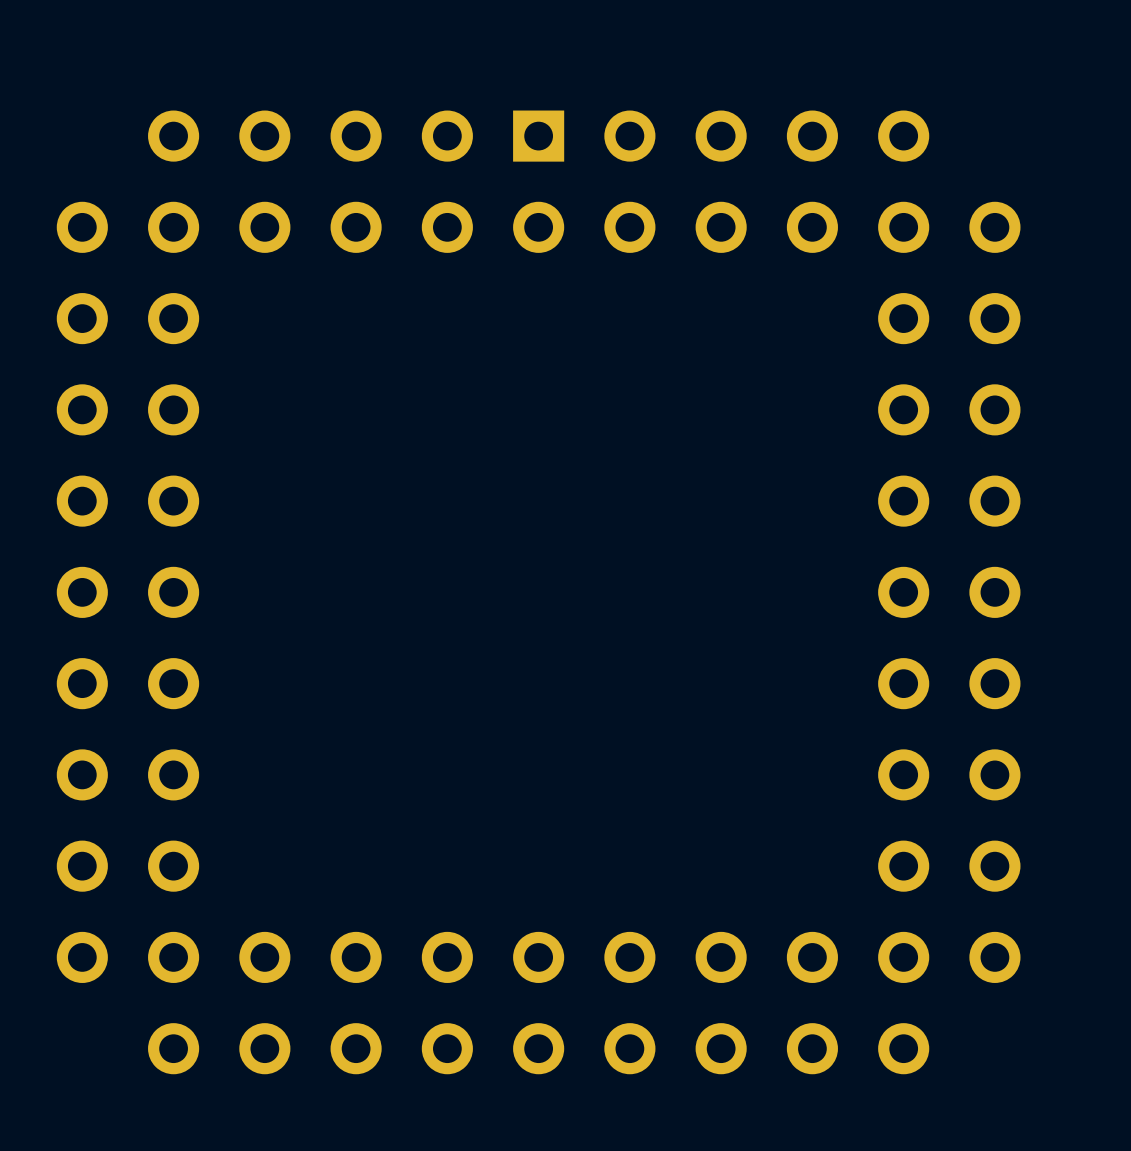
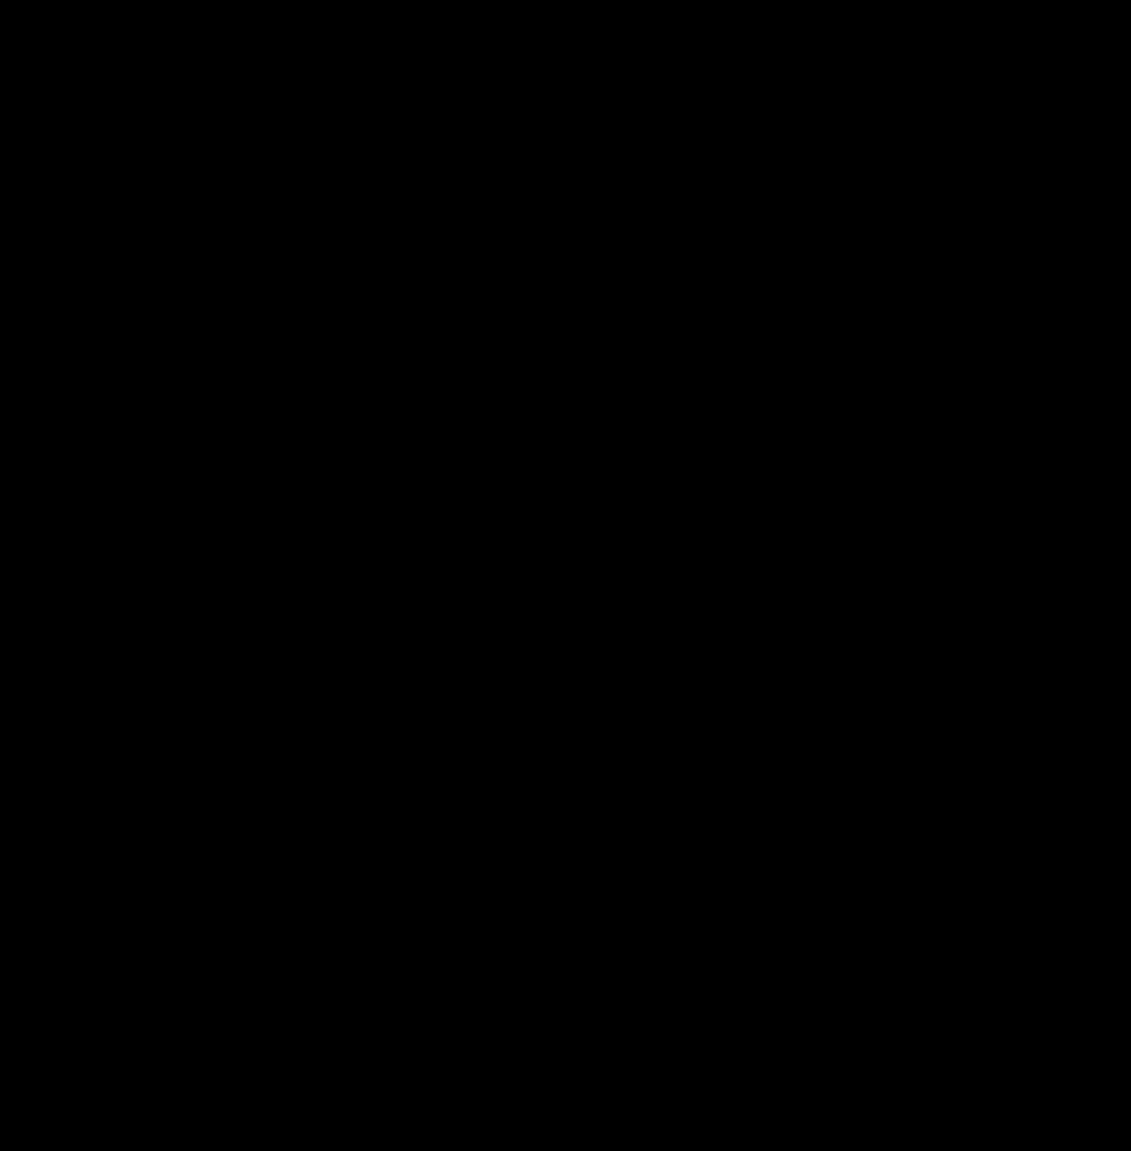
part: (538, 592) -> none

